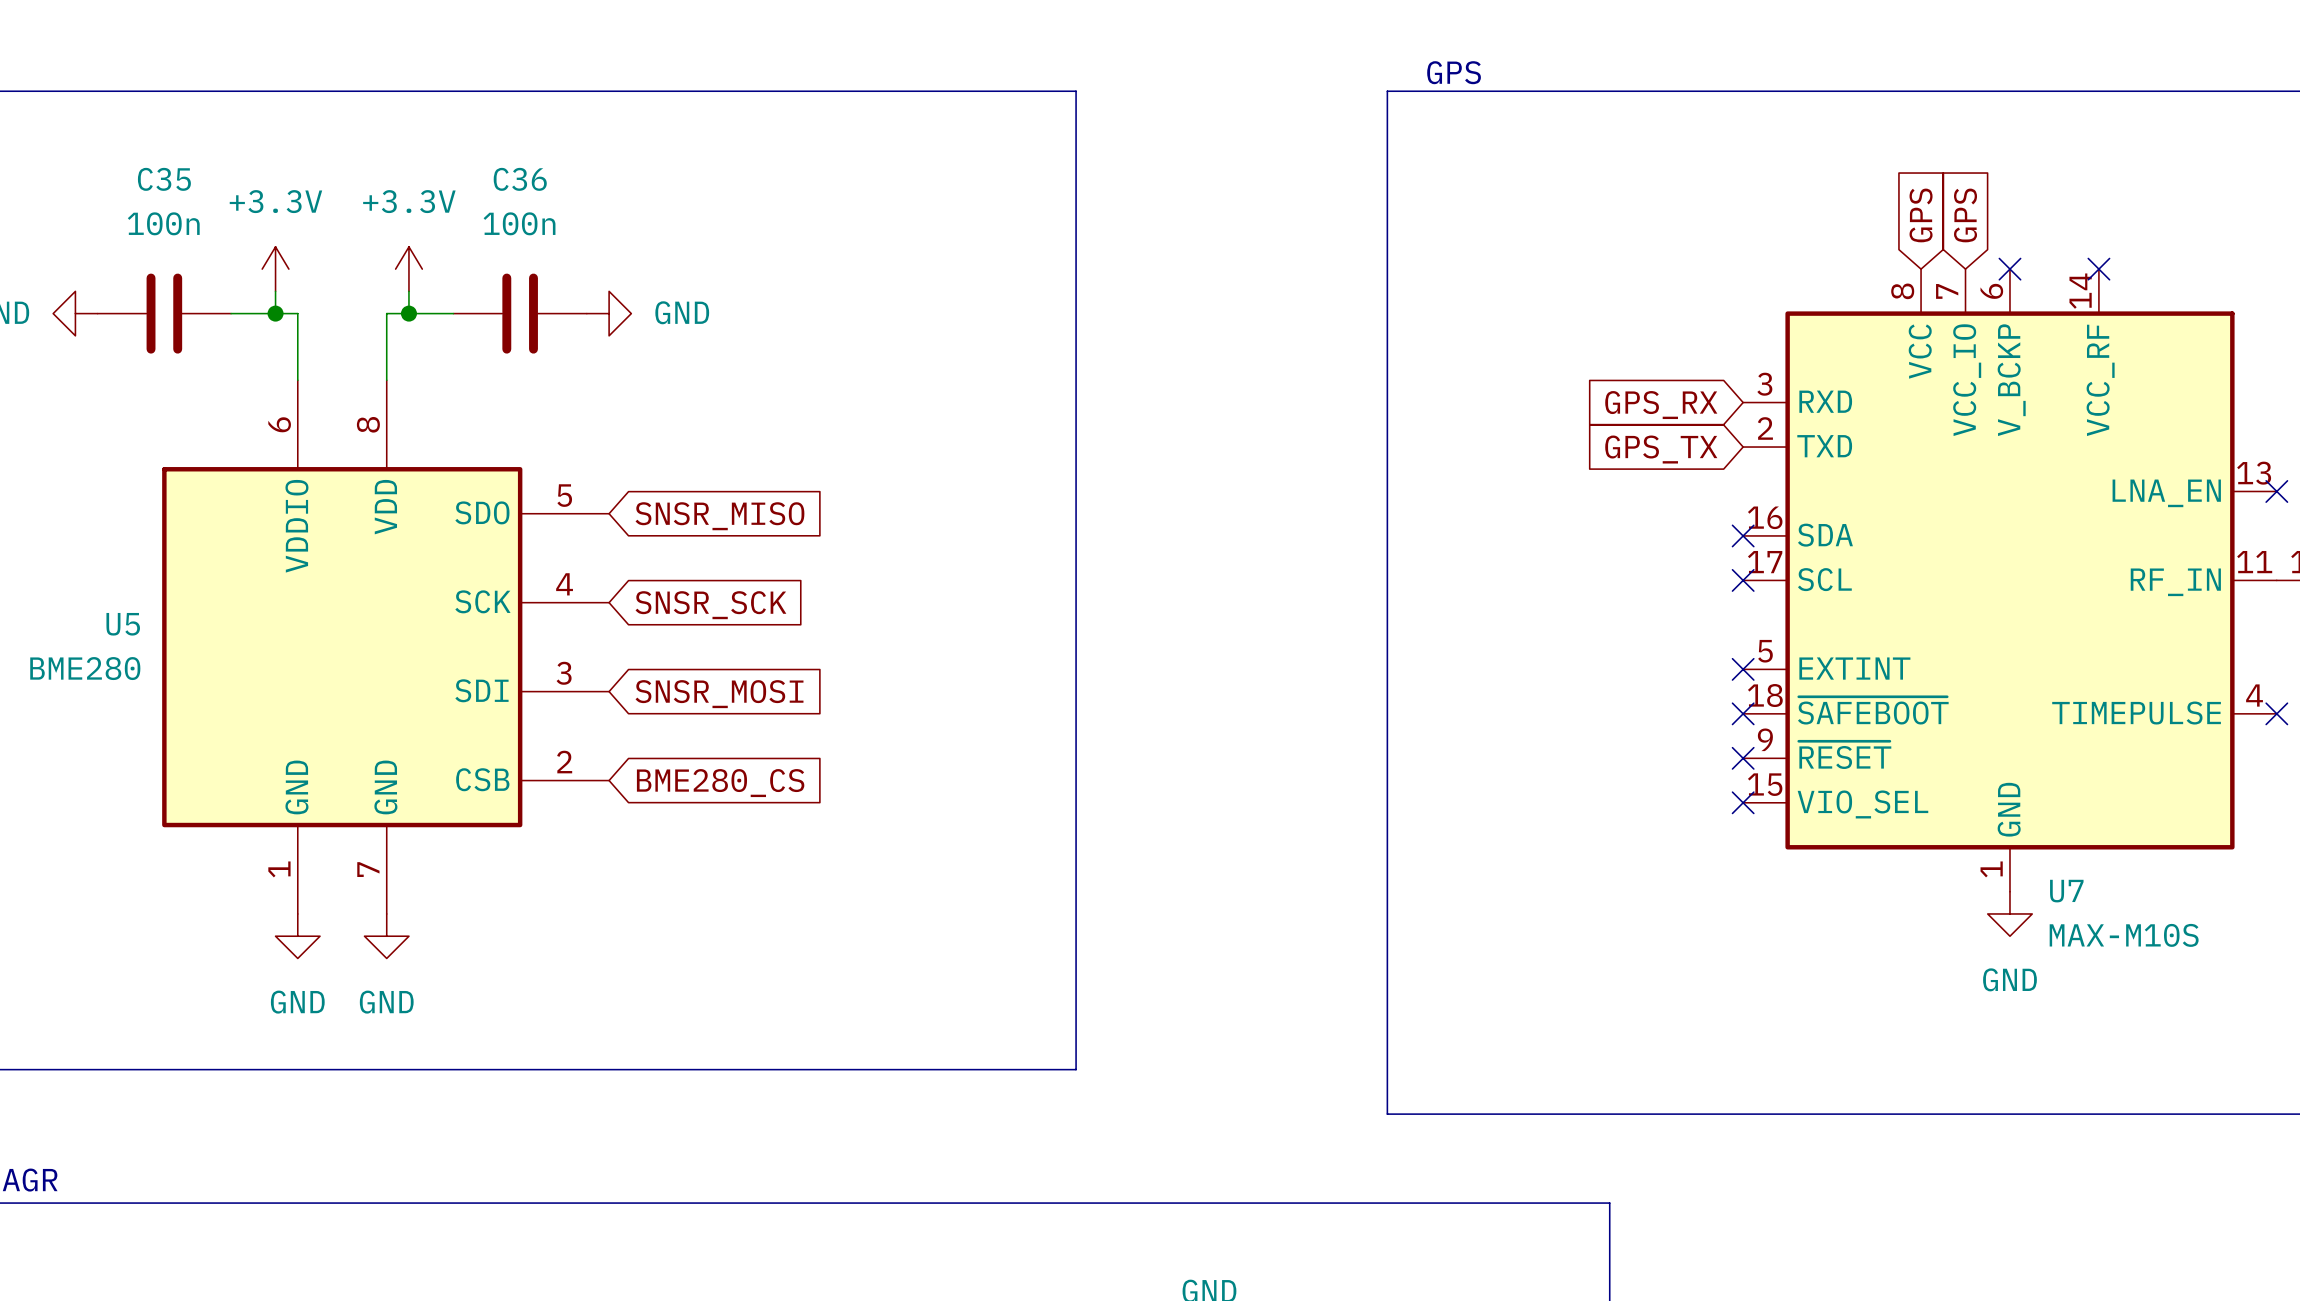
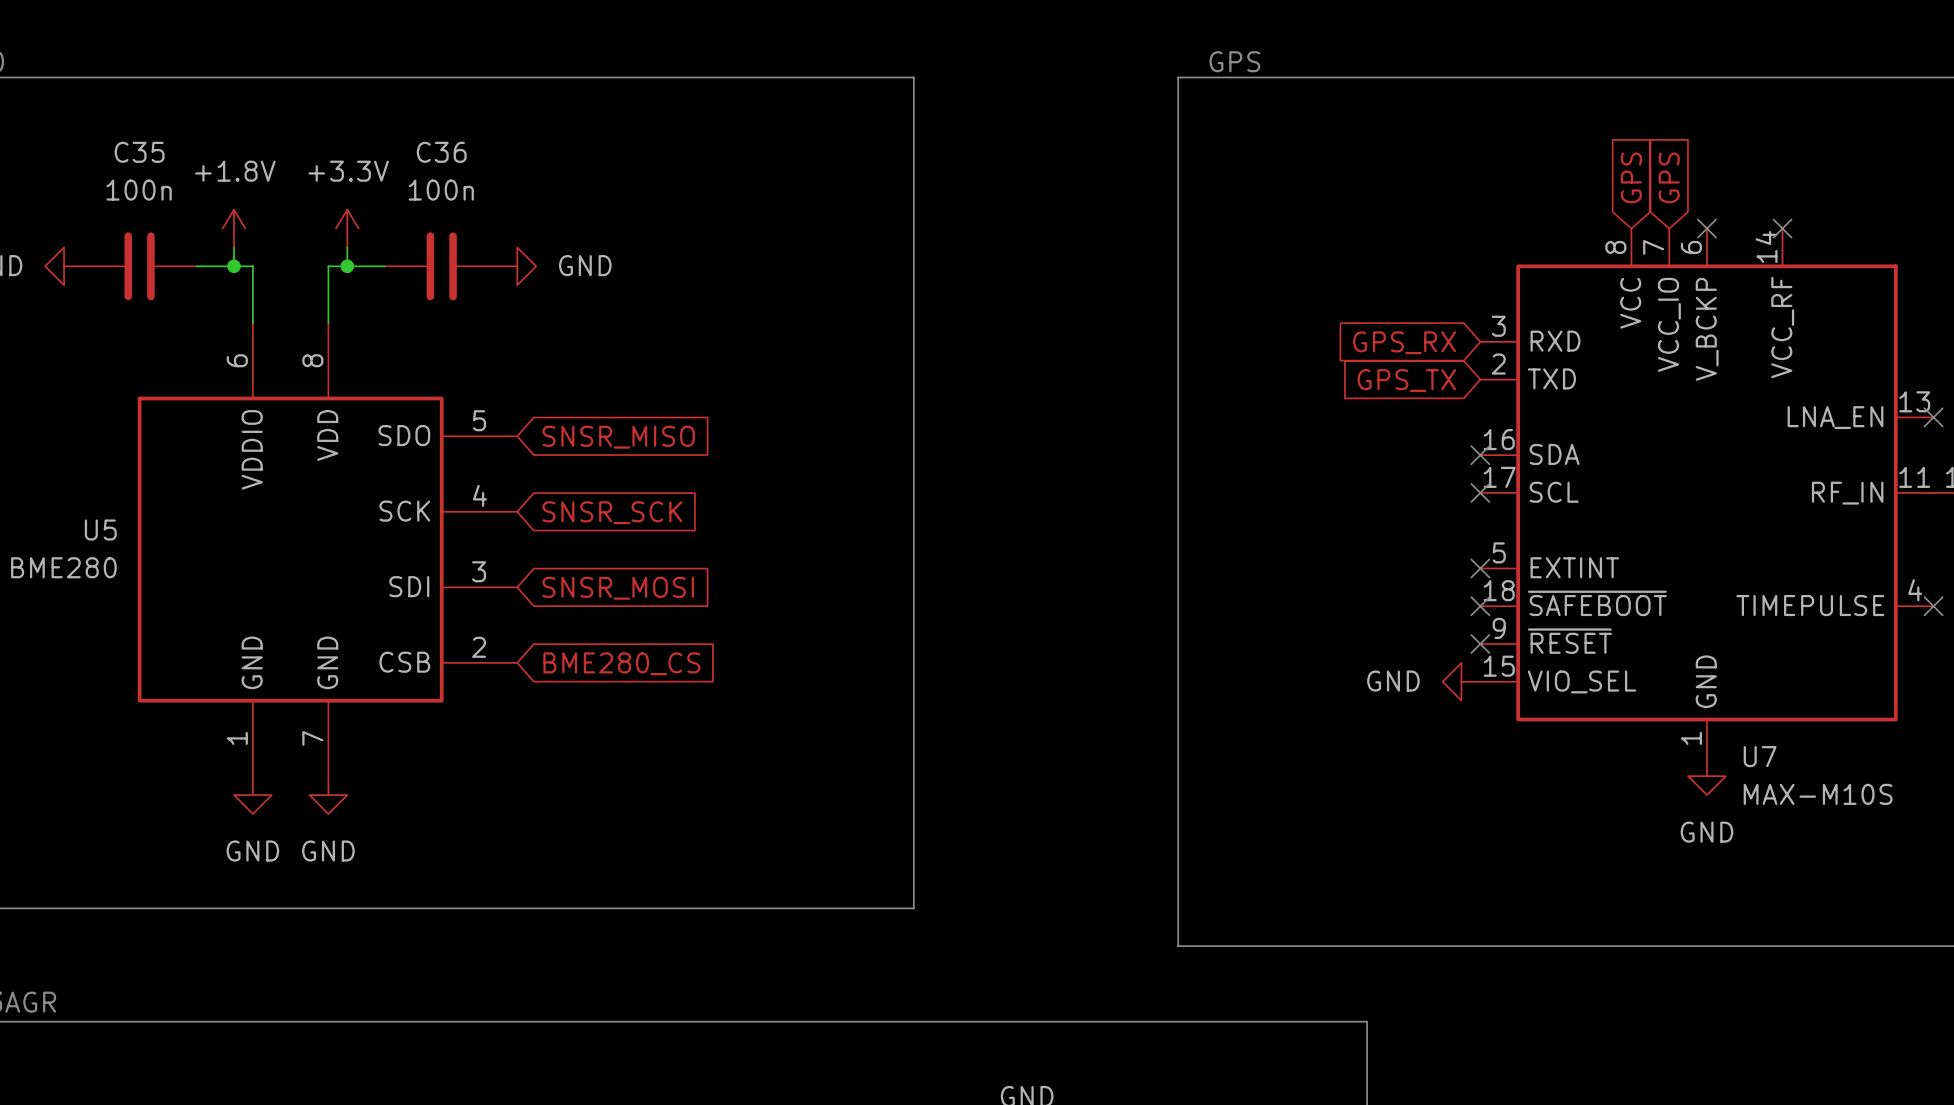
power symbol: +3.3V (275, 269) -> +1.8V (234, 228)
power symbol: none -> GND (1461, 681)
no-connect mark: (1743, 802) -> none

